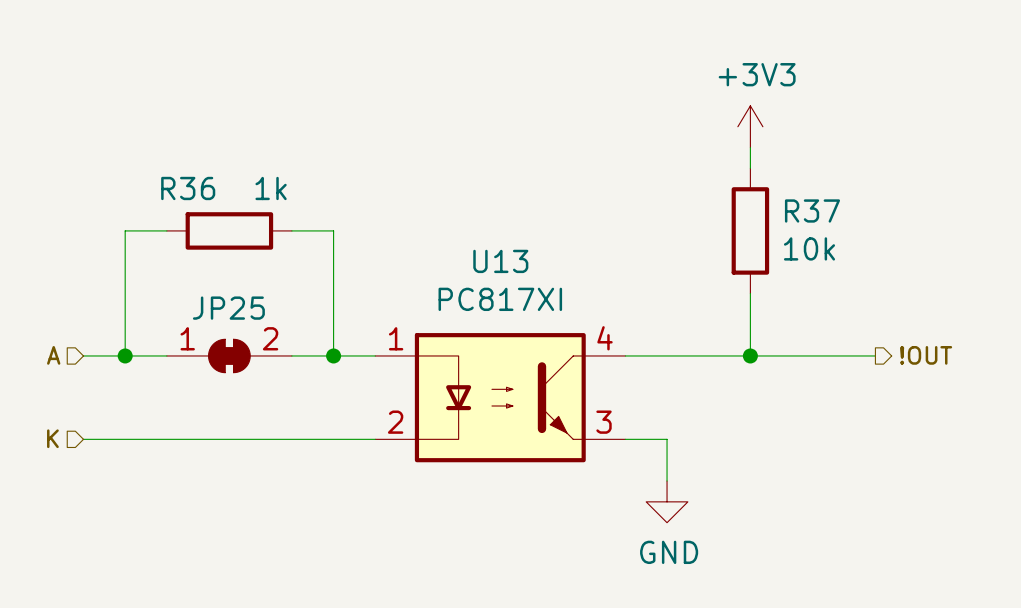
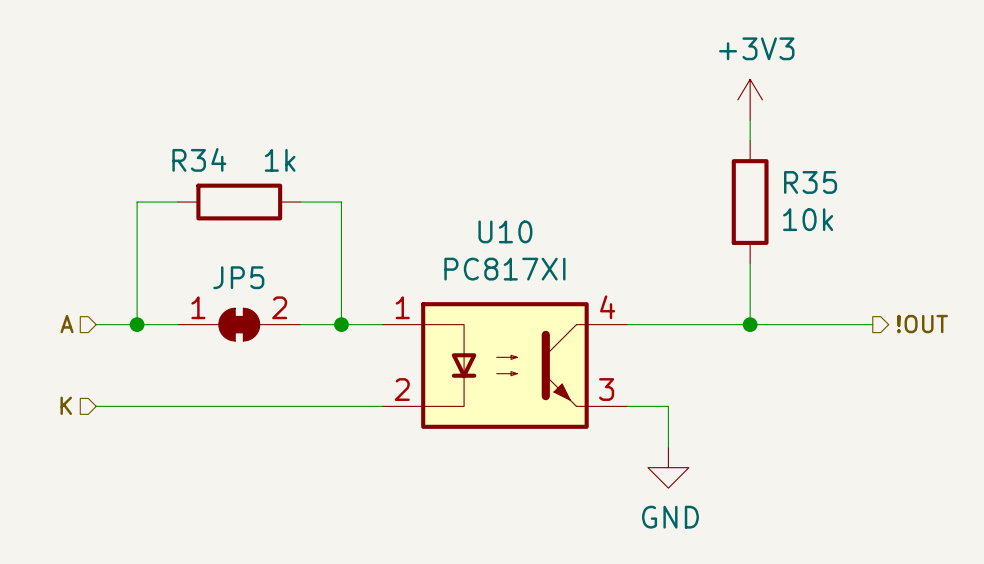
R36 name: R36 (188, 188) -> R34 (199, 159)
R37 name: R37 (812, 210) -> R35 (810, 182)
U13 name: U13 (500, 261) -> U10 (505, 231)
JP25 name: JP25 (228, 308) -> JP5 (238, 277)

